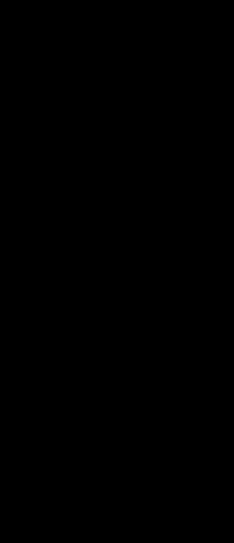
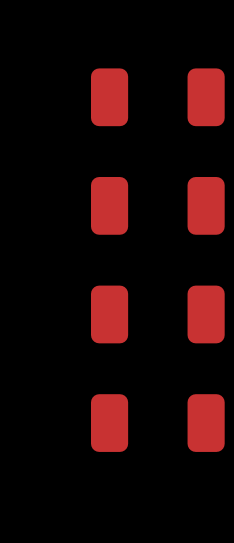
part: none -> (157, 97)
part: none -> (157, 205)
part: none -> (157, 314)
part: none -> (157, 423)

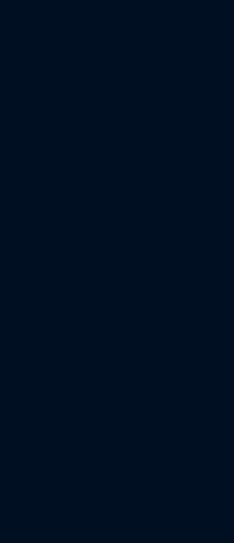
part: (157, 97) -> none
part: (157, 205) -> none
part: (157, 314) -> none
part: (157, 423) -> none

